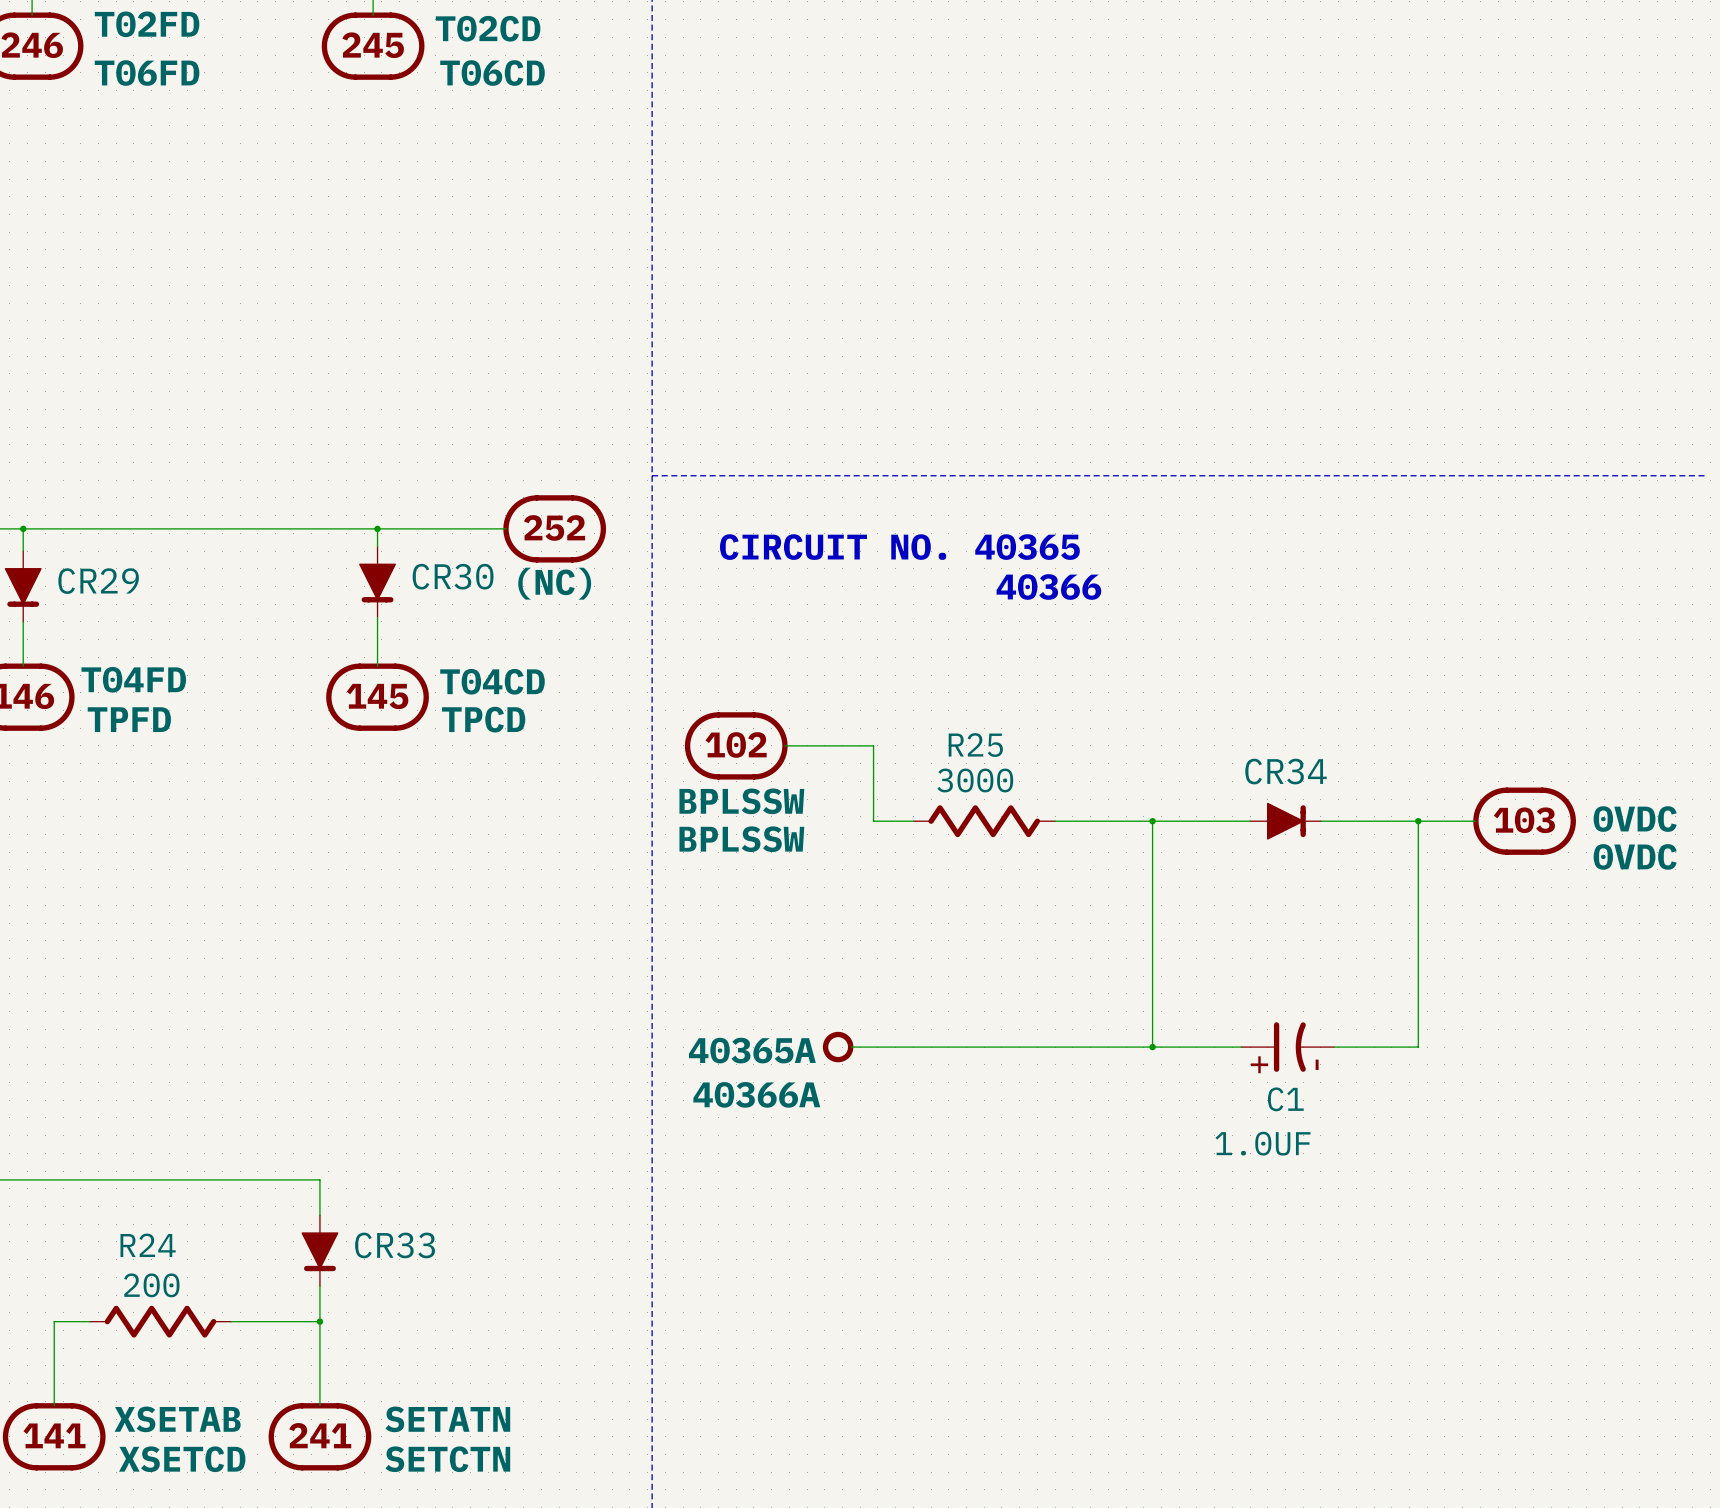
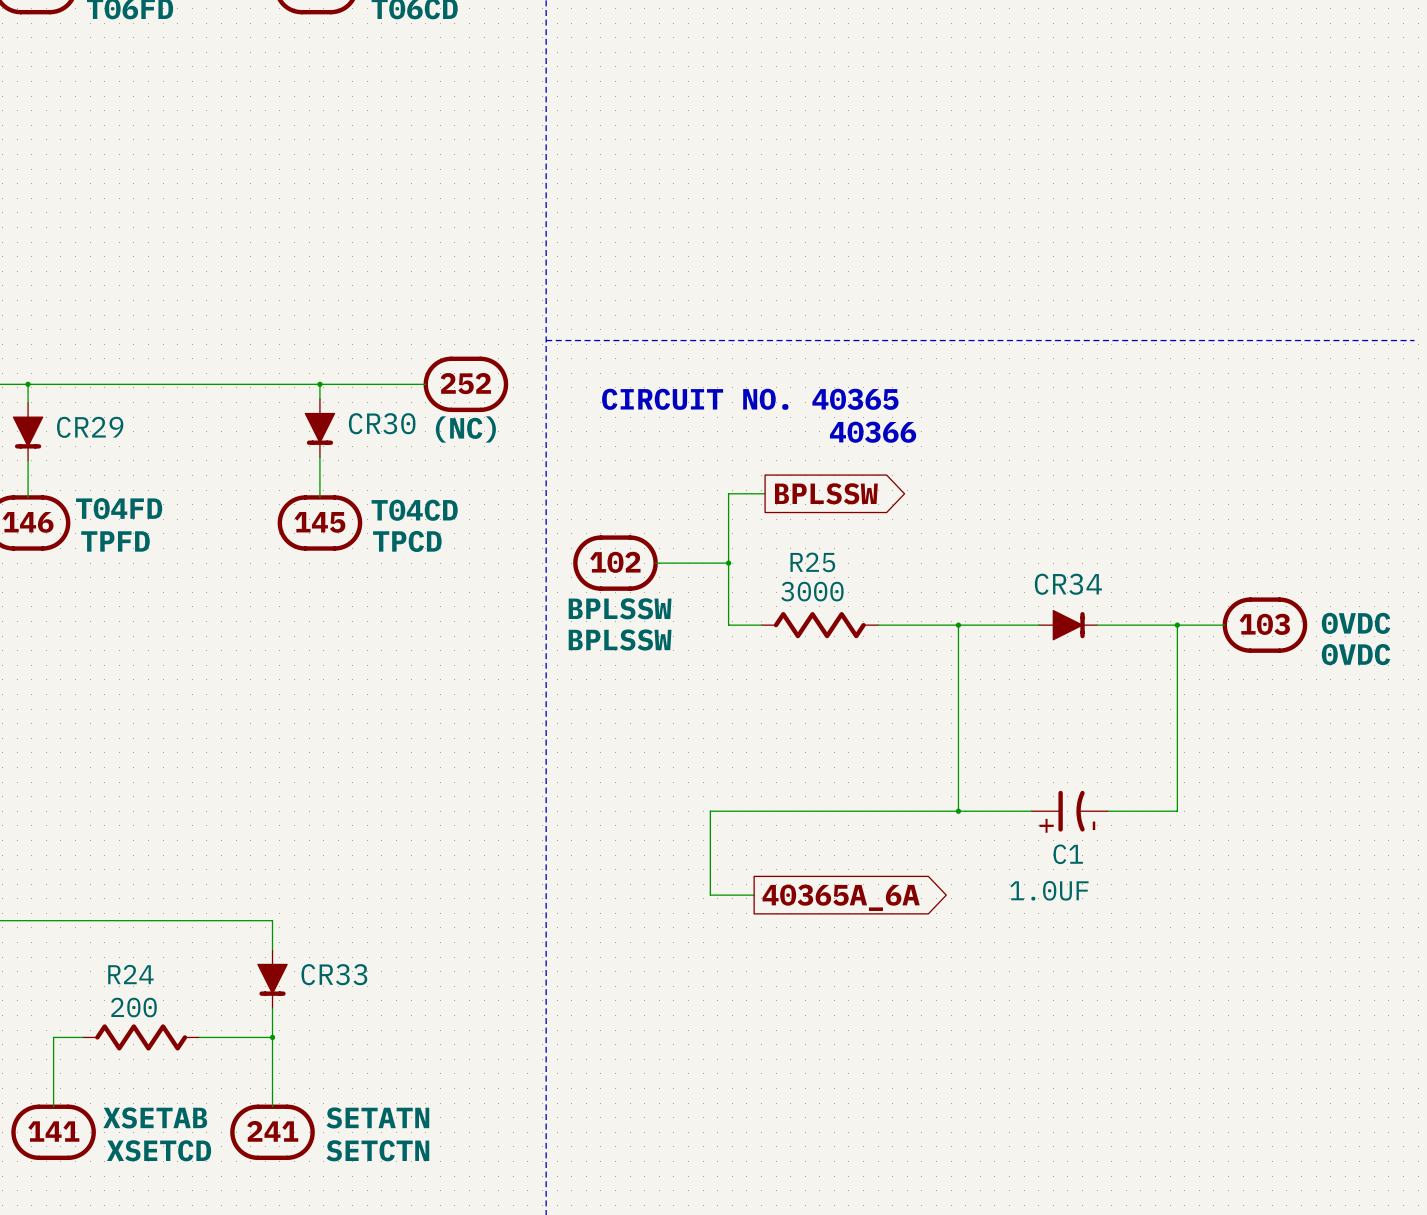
wire: none -> (765, 493) (728, 493) (728, 563)
global label: none -> BPLSSW (826, 493)
junction: none -> (728, 563)
part: (838, 1047) -> none
wire: none -> (710, 811) (710, 895) (754, 895)
global label: none -> 40365A_6A (841, 897)

